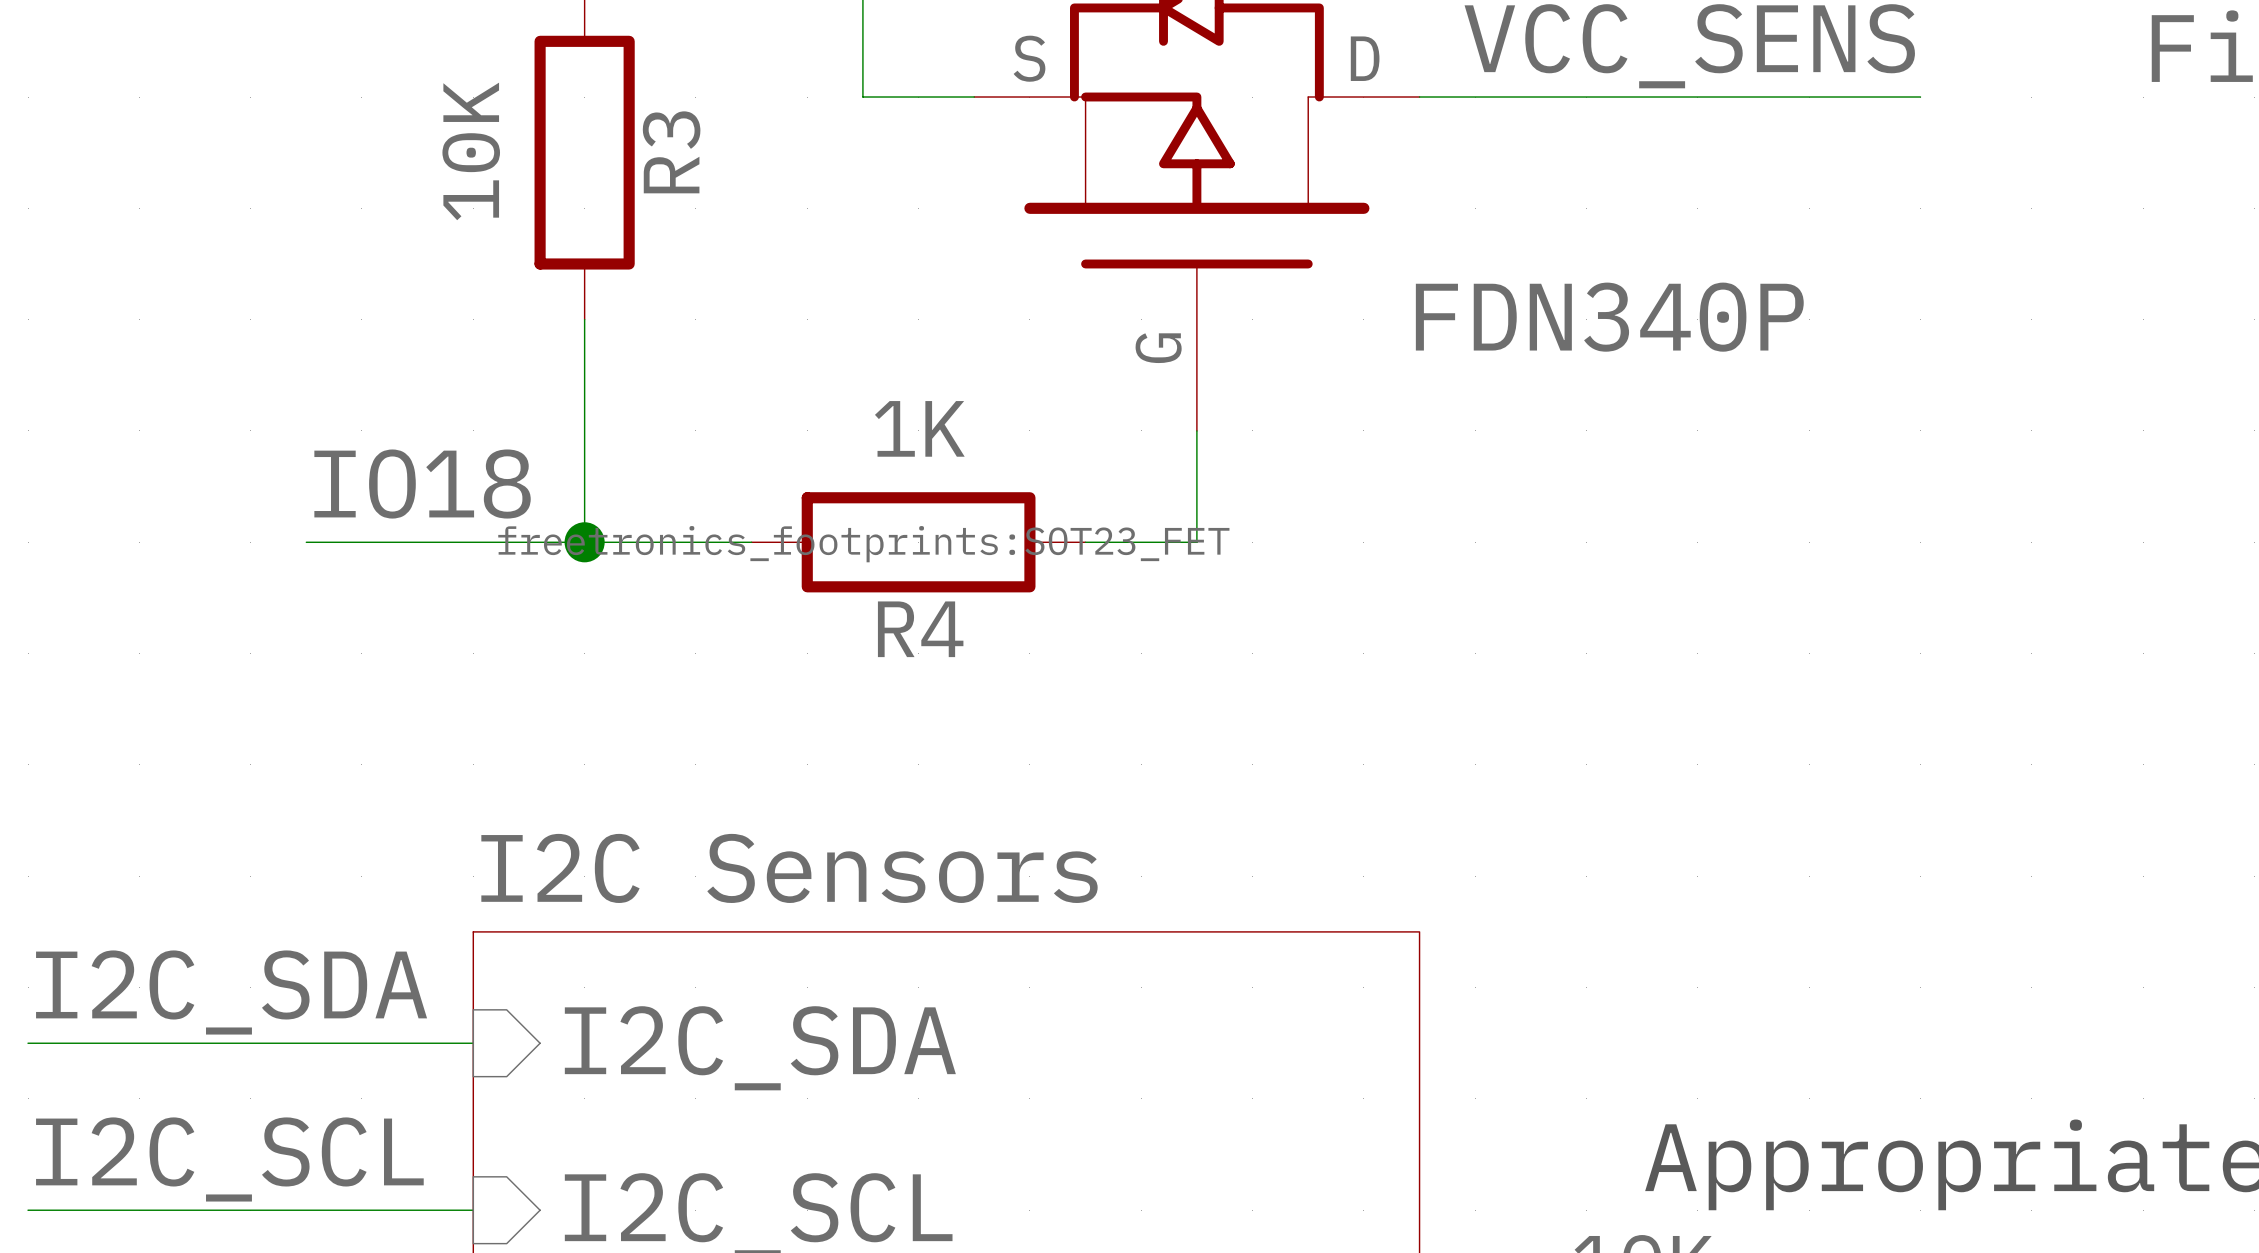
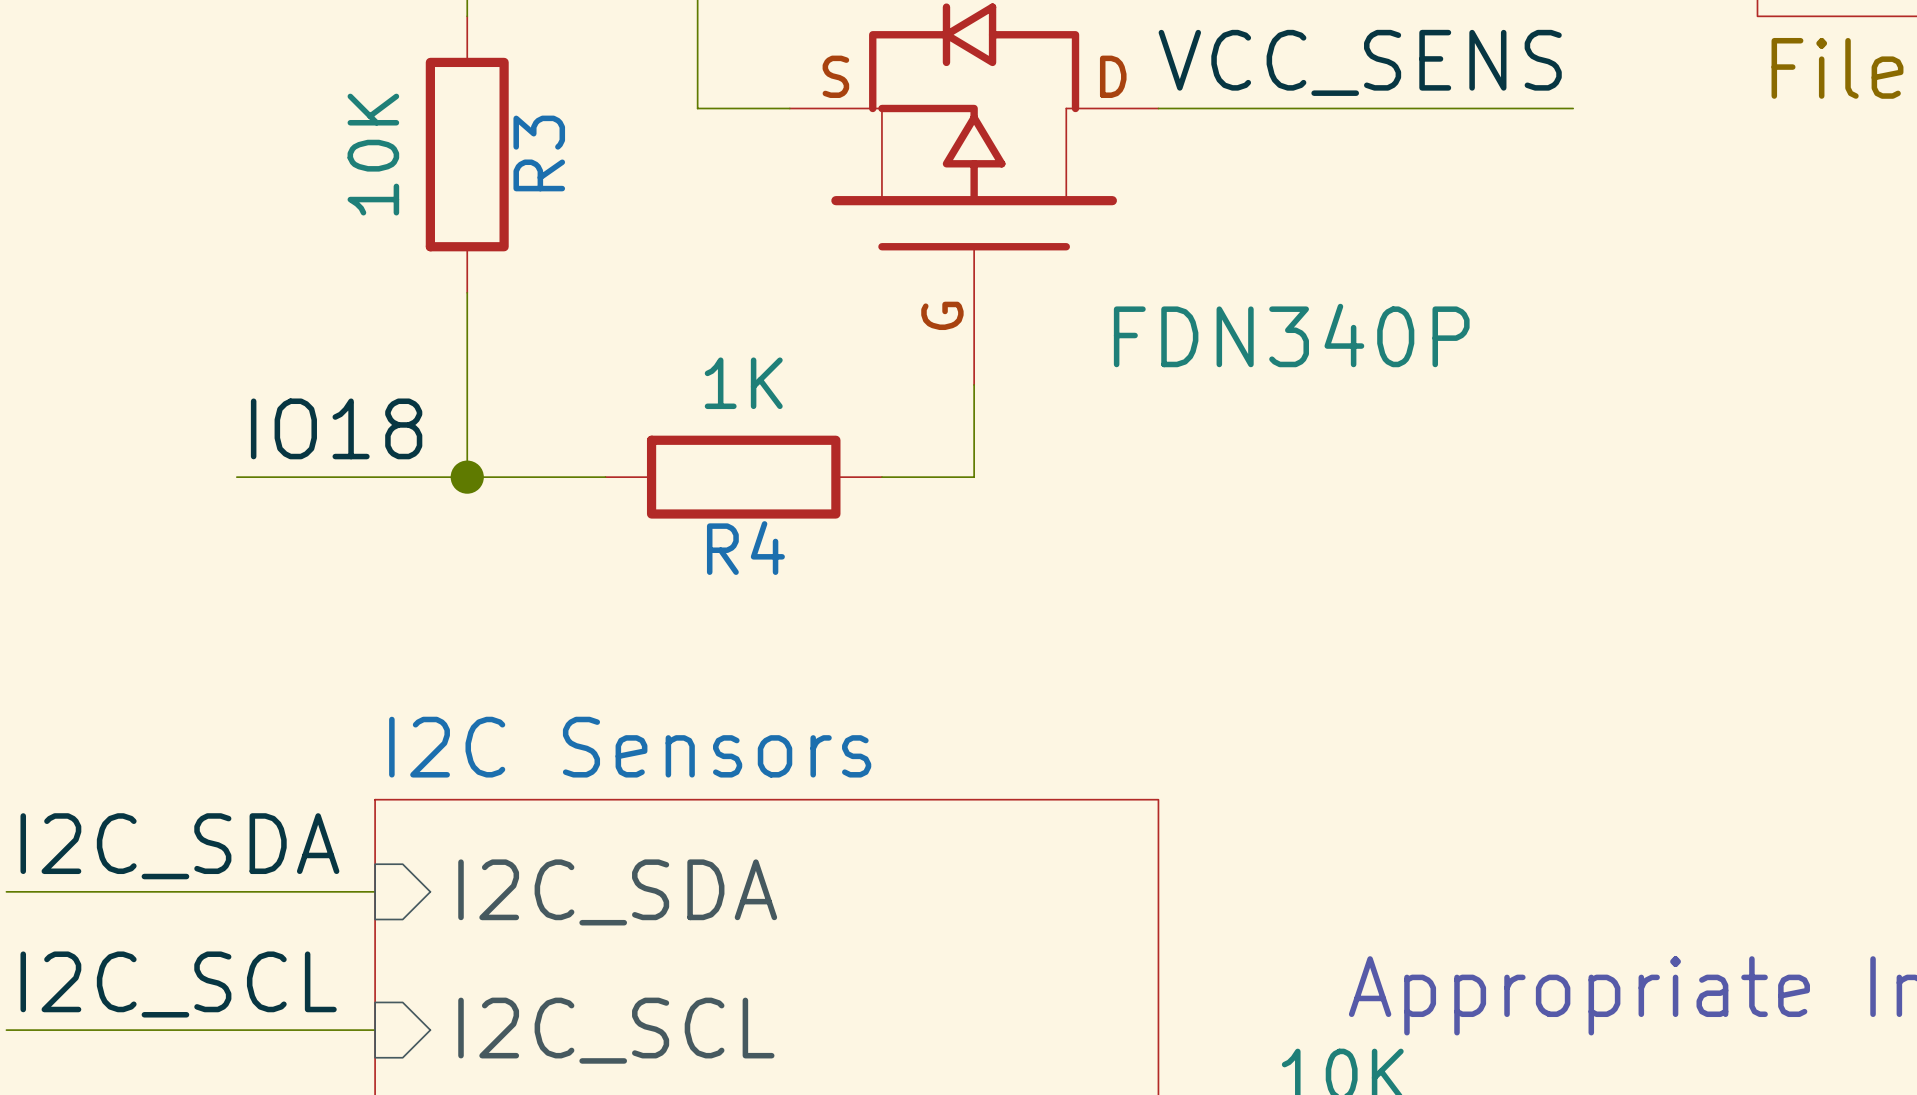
part value position: FDN340P (1609, 317) -> FDN340P (1291, 335)
part text: freetronics_footprints:SOT23_FET (863, 544) -> none

